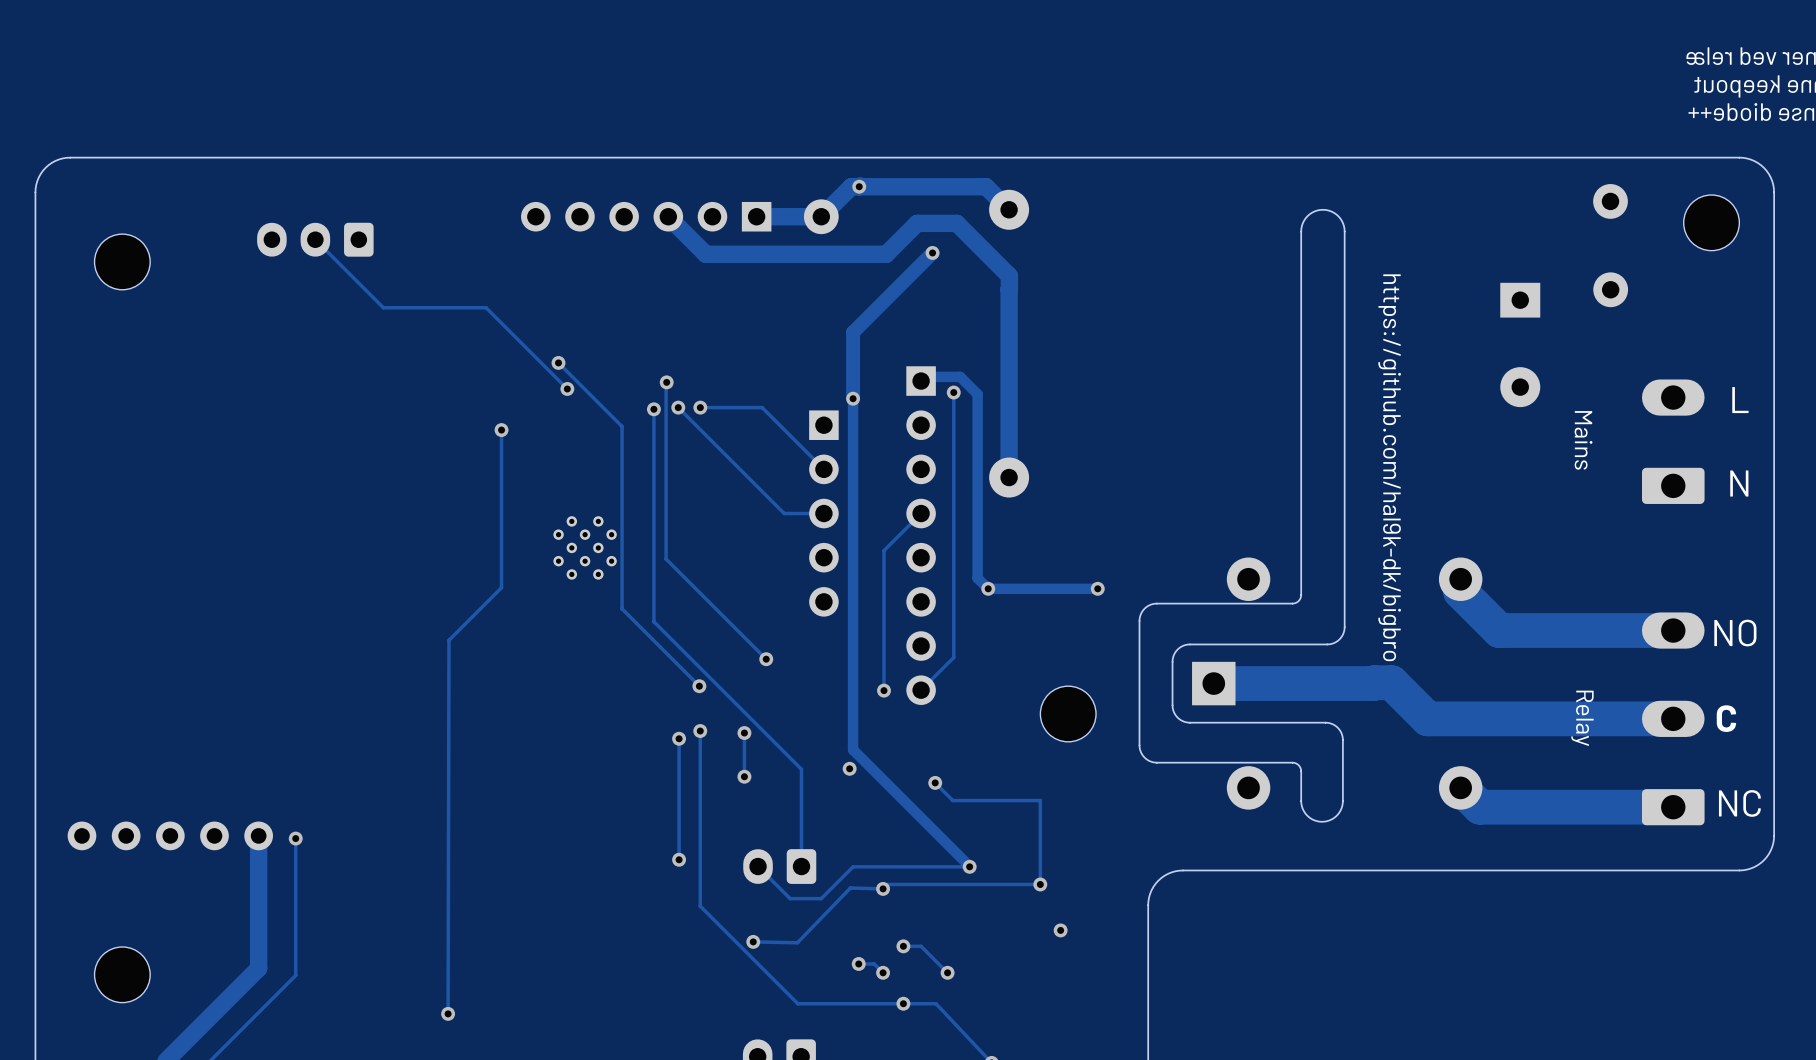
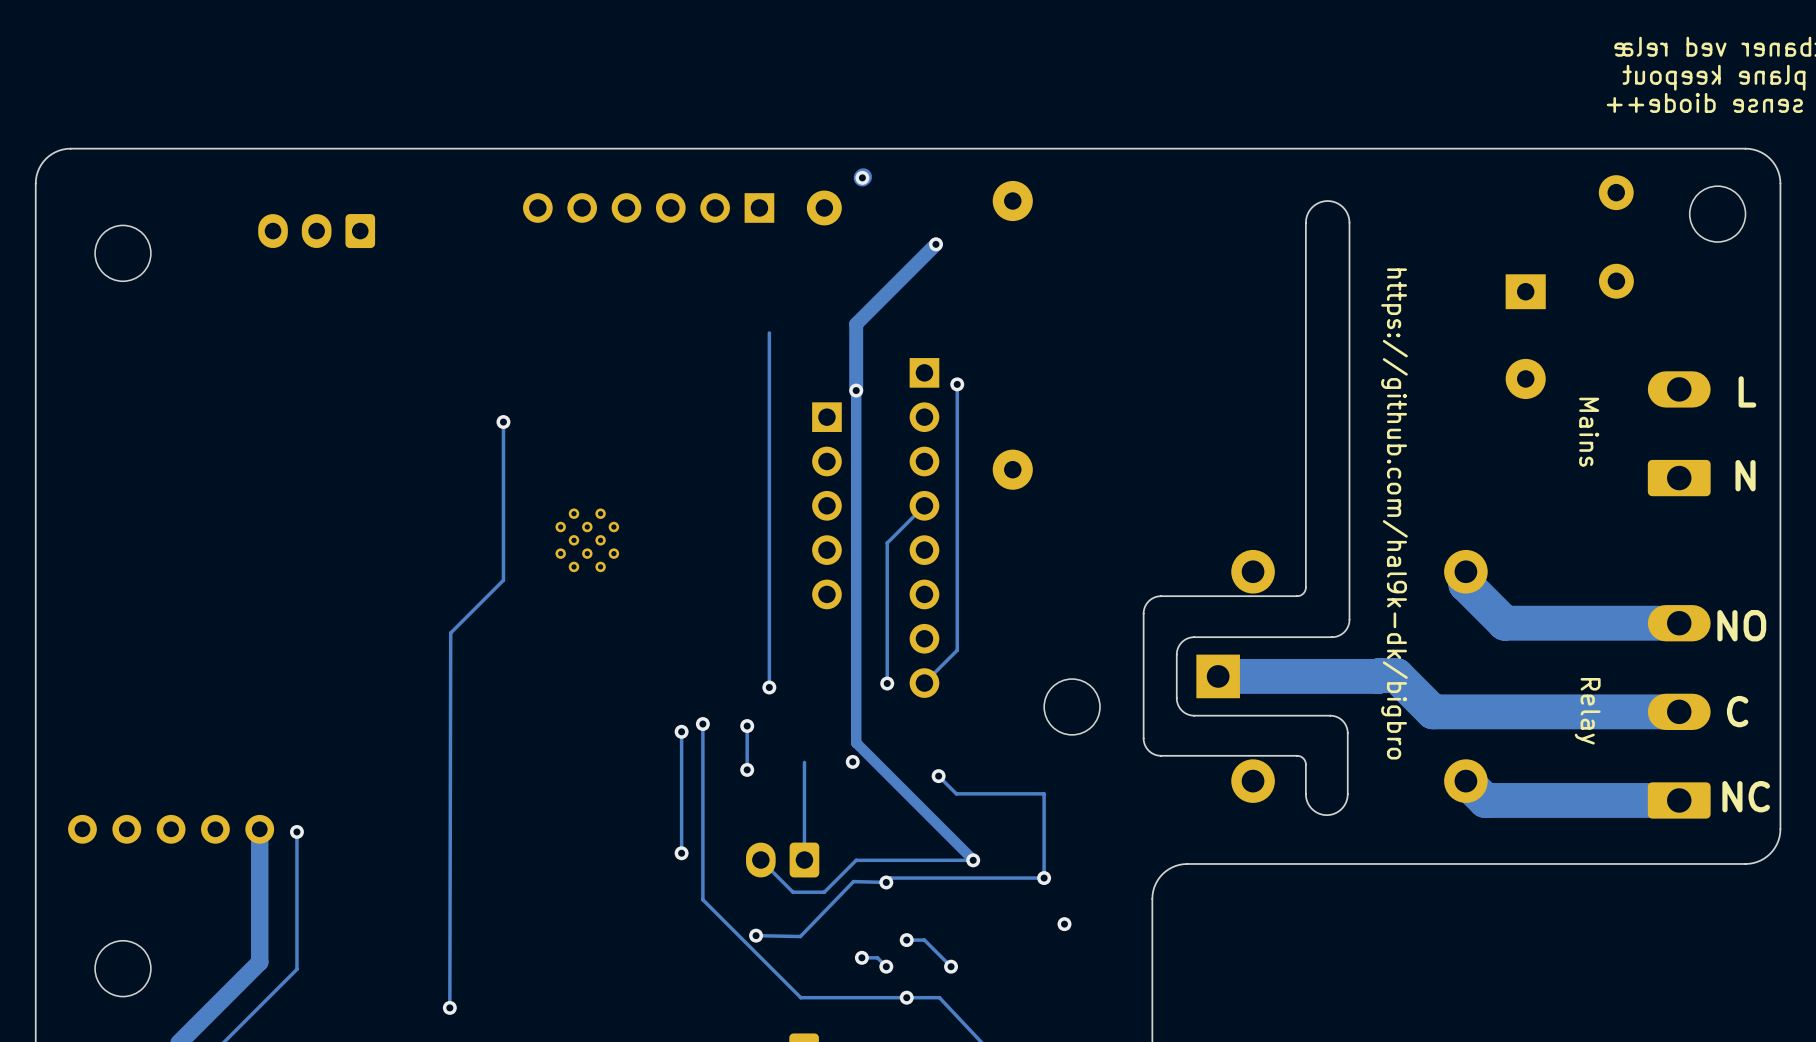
track: (1009, 209) (986, 186) (851, 186) (821, 216) (756, 216) -> none
track: (668, 216) (705, 254) (886, 254) (917, 223) (956, 223) (1009, 275) (1009, 477) -> none
track: (315, 239) (383, 307) (486, 307) (567, 388) -> none
track: none -> (769, 332) (769, 687)
track: (558, 362) (622, 426) (622, 608) (699, 686) -> none
via: (558, 362) -> none
track: (921, 381) (925, 376) (960, 376) (977, 394) (977, 578) (988, 588) (1097, 588) -> none
track: (666, 382) (666, 559) (766, 659) -> none
via: (666, 382) -> none
via: (567, 388) -> none
track: (678, 407) (784, 513) (823, 513) -> none
via: (678, 407) -> none
track: (700, 407) (762, 407) (823, 469) -> none
via: (700, 407) -> none
track: (653, 409) (653, 621) (801, 769) -> none
via: (653, 409) -> none
via: (988, 588) -> none
via: (1097, 588) -> none
via: (766, 659) -> none
via: (699, 686) -> none
via: none -> (769, 687)

